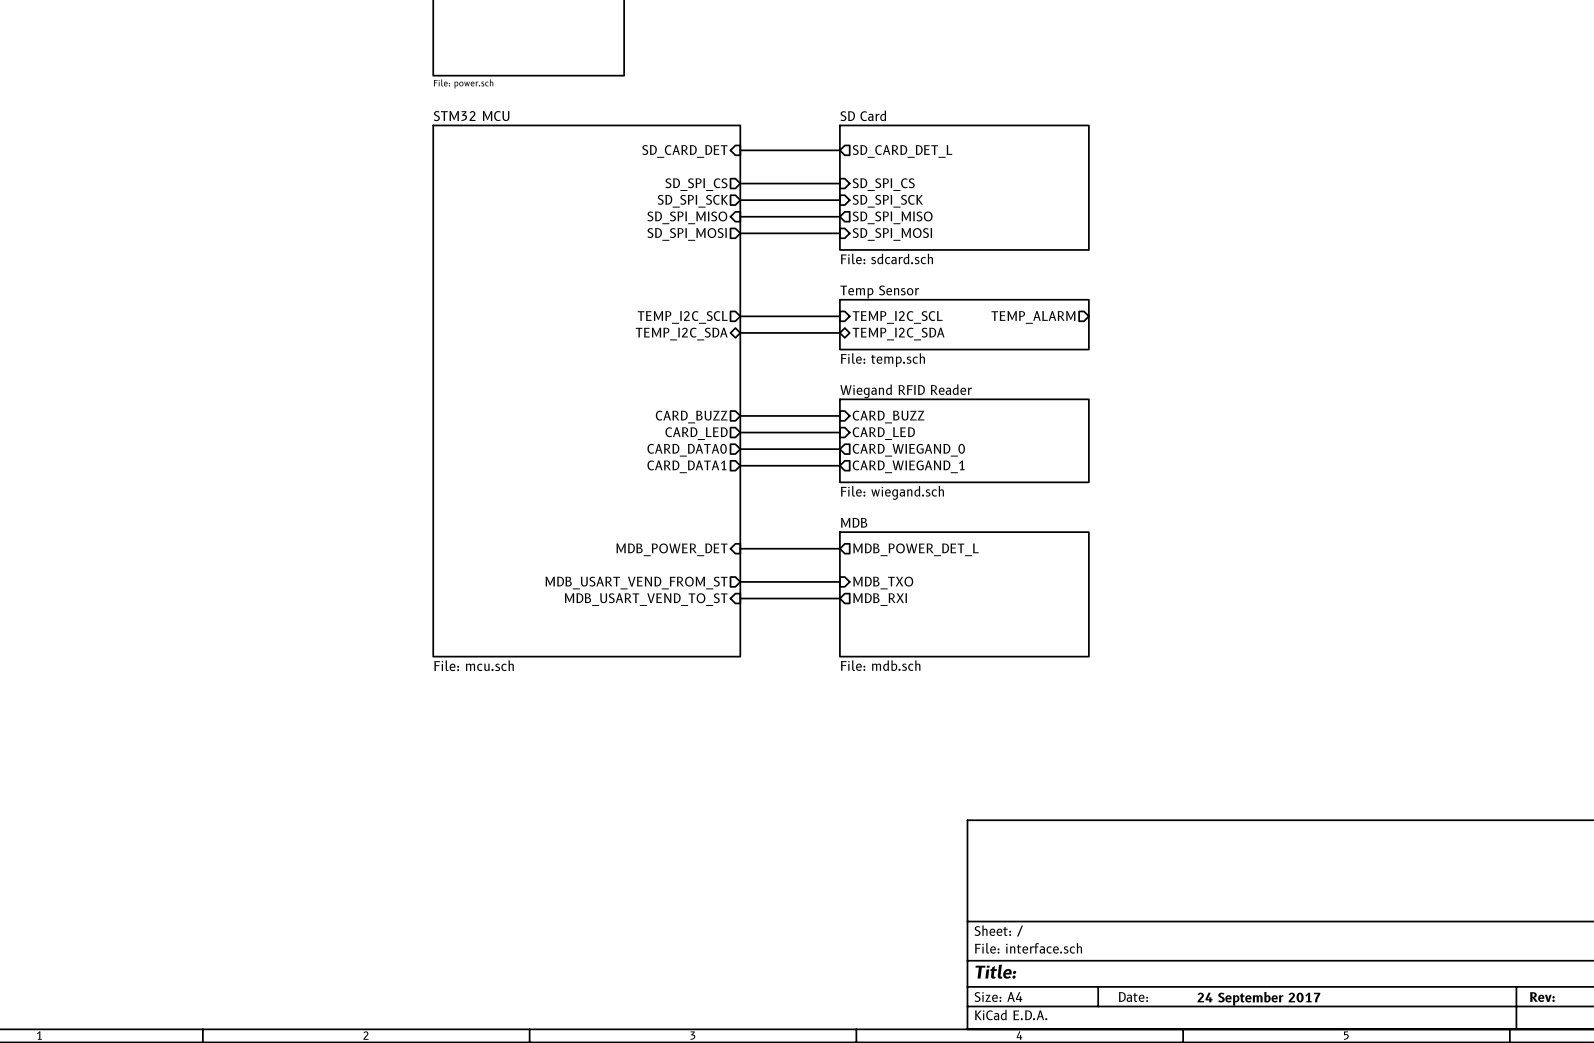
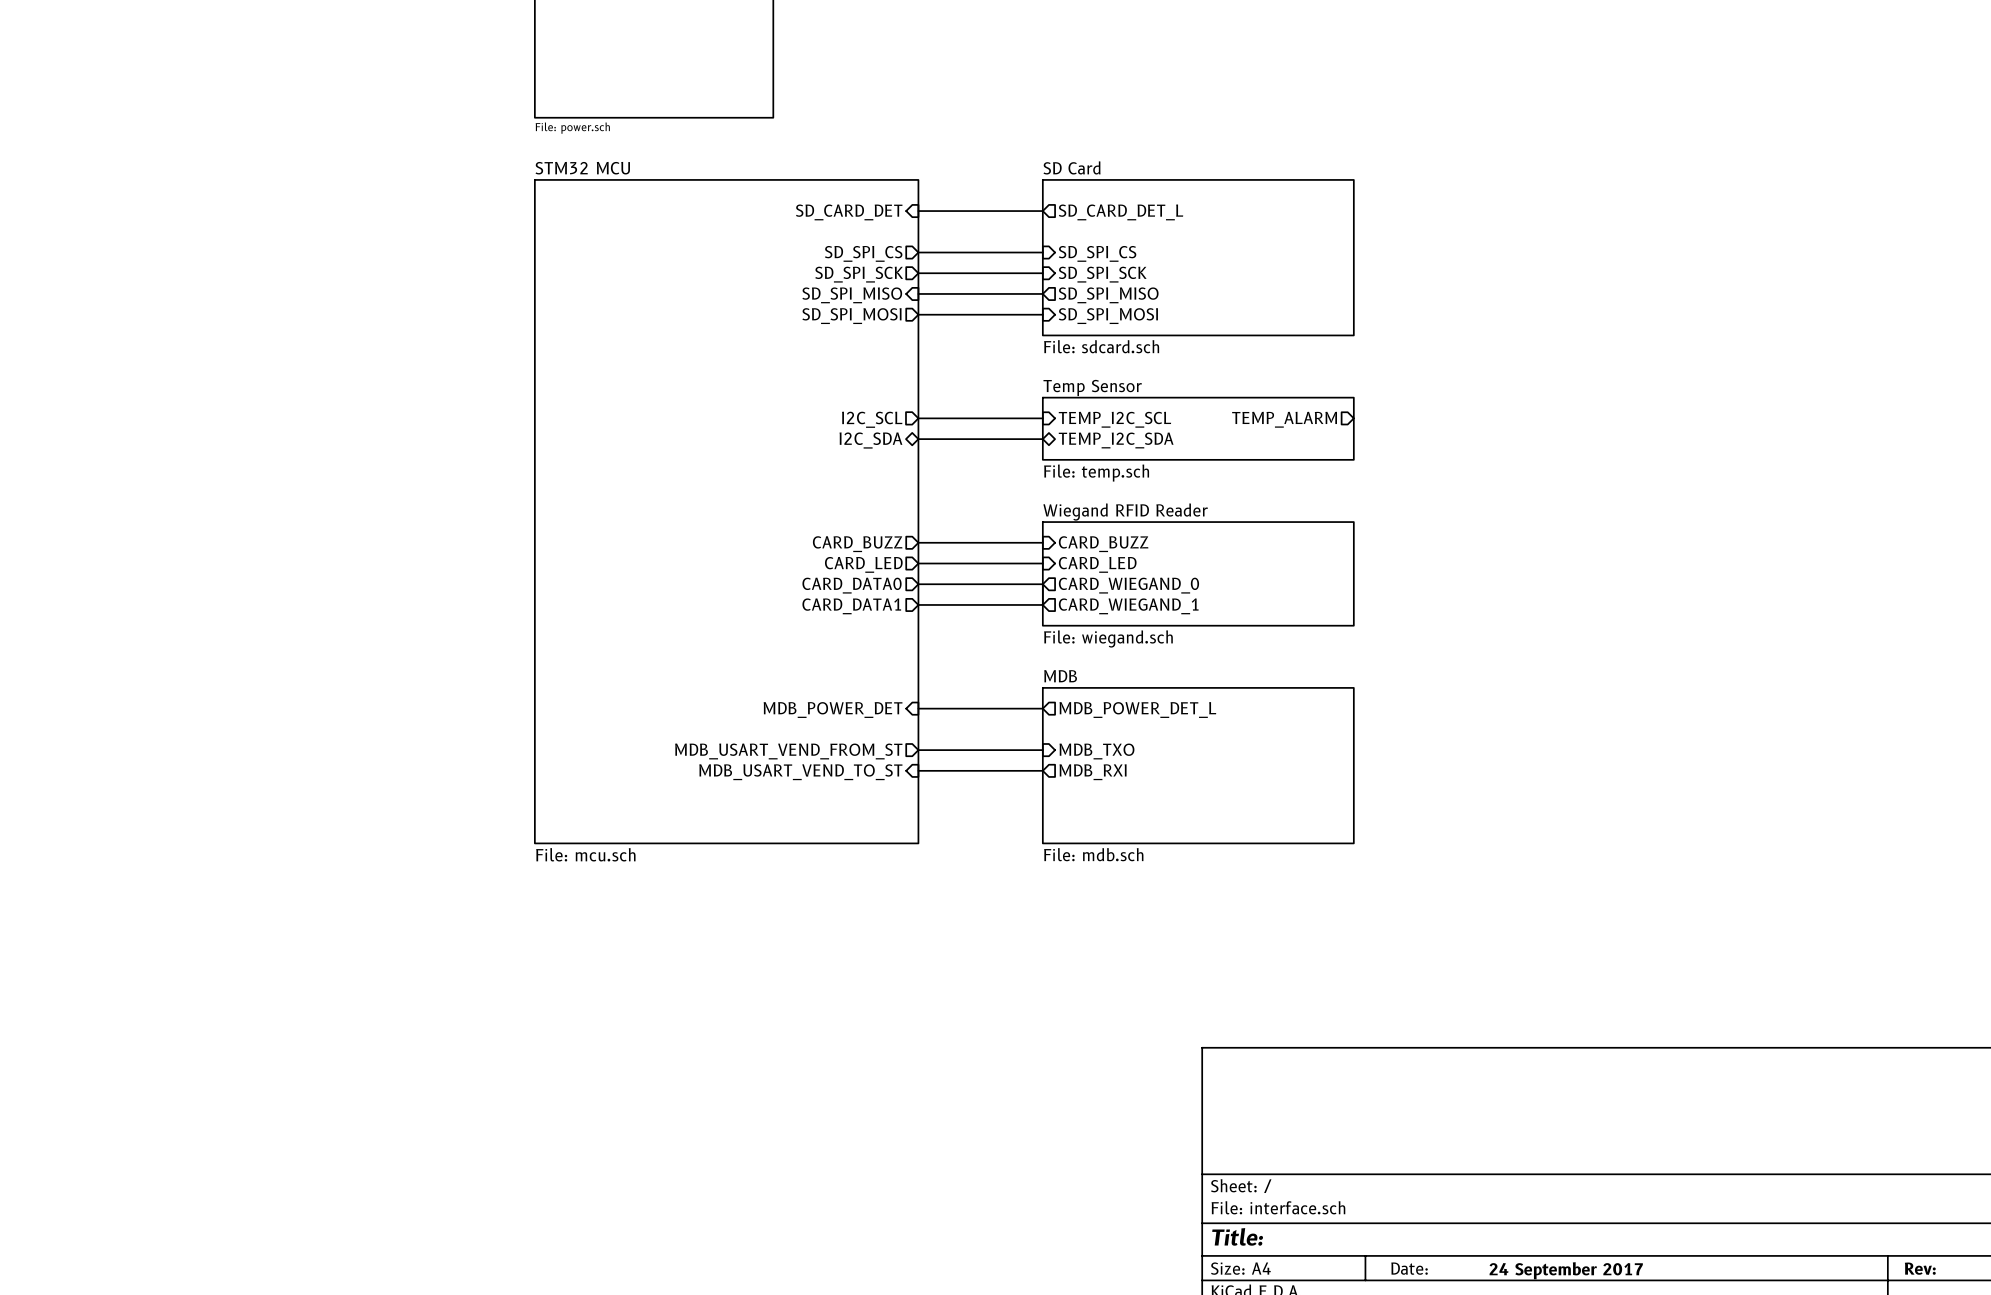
sheet pin: TEMP_I2C_SCL (682, 317) -> I2C_SCL (872, 419)
sheet pin: TEMP_I2C_SDA (681, 334) -> I2C_SDA (870, 440)

